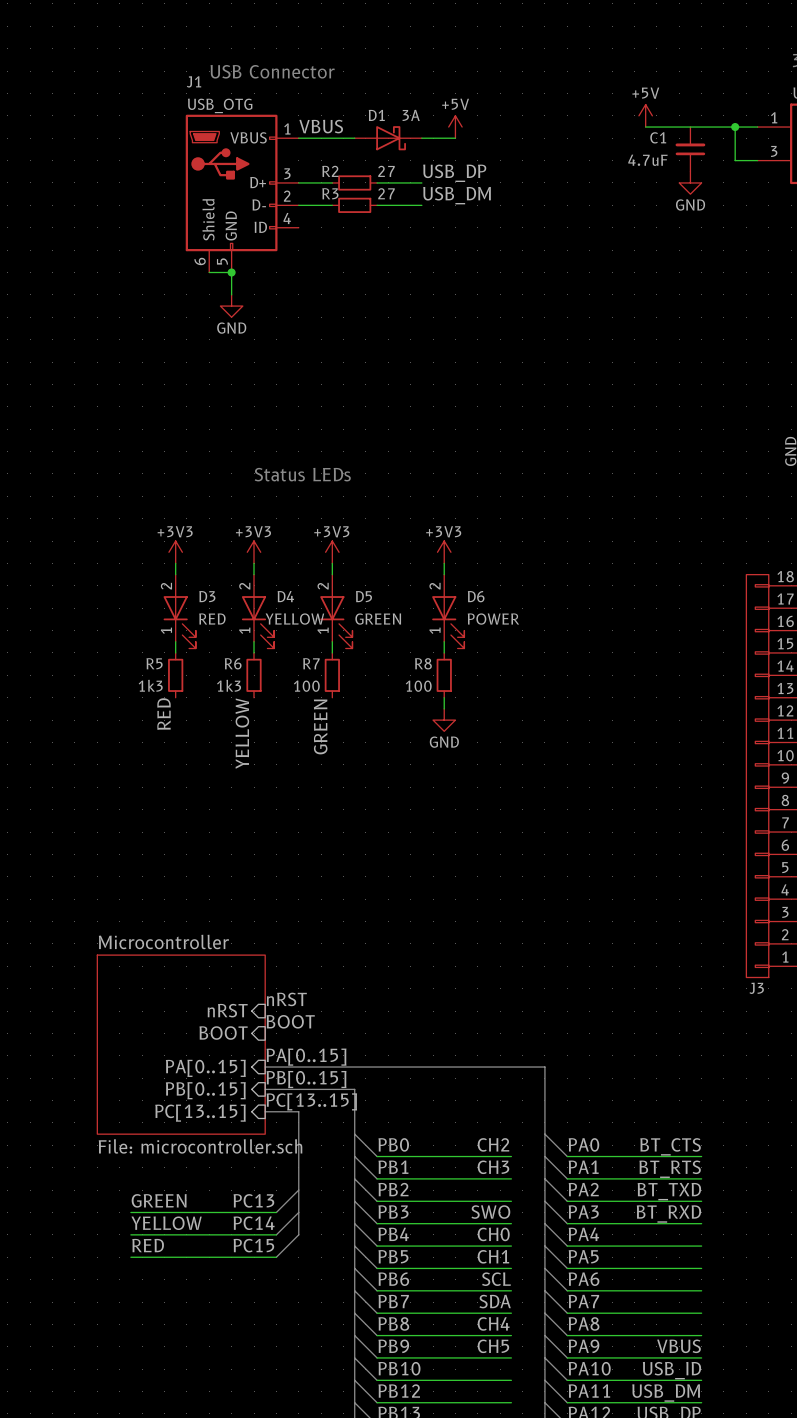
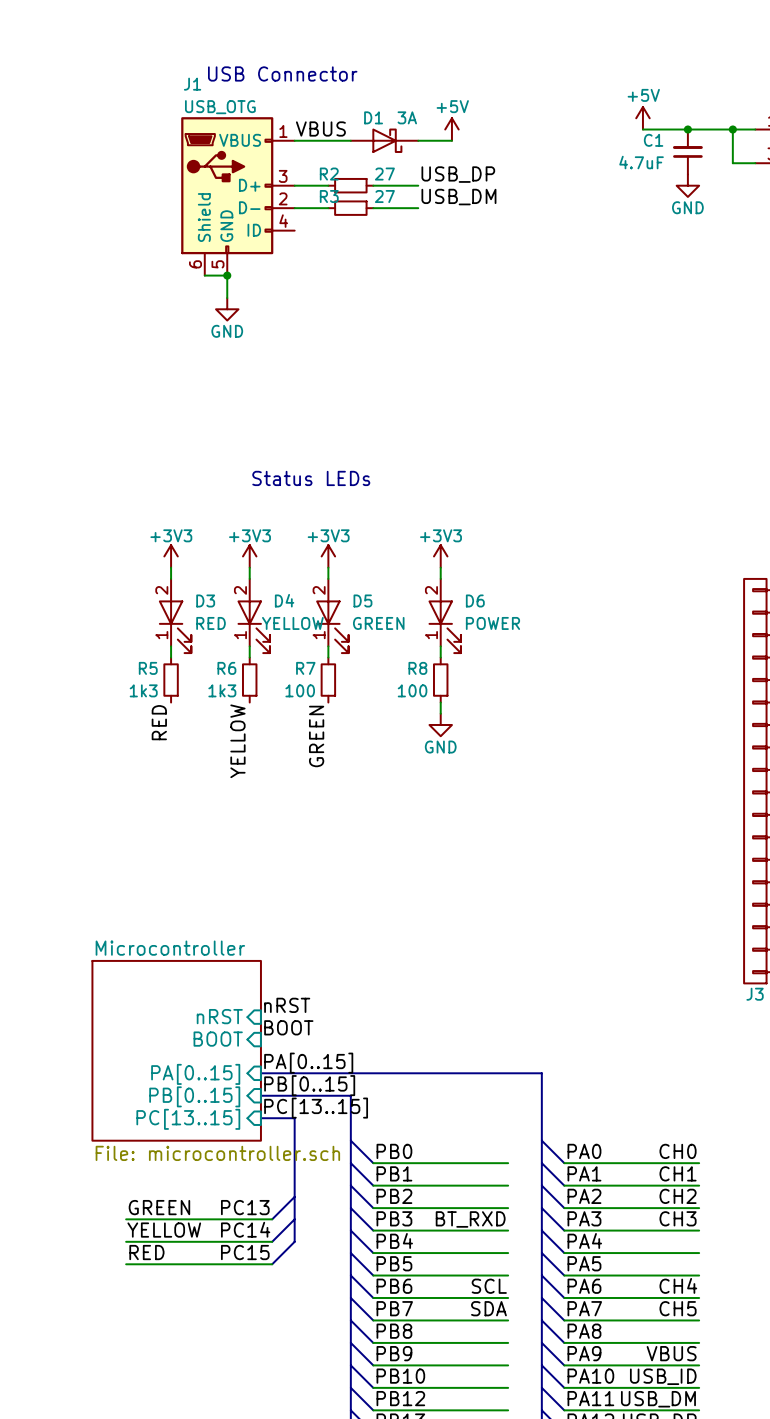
junction: none -> (687, 129)
label: CH2 (493, 1144) -> none
label: BT_CTS (670, 1146) -> CH0 (678, 1151)
label: CH3 (493, 1167) -> none
label: BT_RTS (670, 1169) -> CH1 (678, 1173)
label: BT_TXD (669, 1191) -> CH2 (678, 1196)
label: SWO (490, 1212) -> BT_RXD (470, 1219)
label: BT_RXD (668, 1213) -> CH3 (678, 1218)
label: CH0 (493, 1234) -> none
label: CH1 (493, 1256) -> none
label position: CH4 (493, 1323) -> CH4 (678, 1285)
label position: CH5 (493, 1346) -> CH5 (678, 1308)

